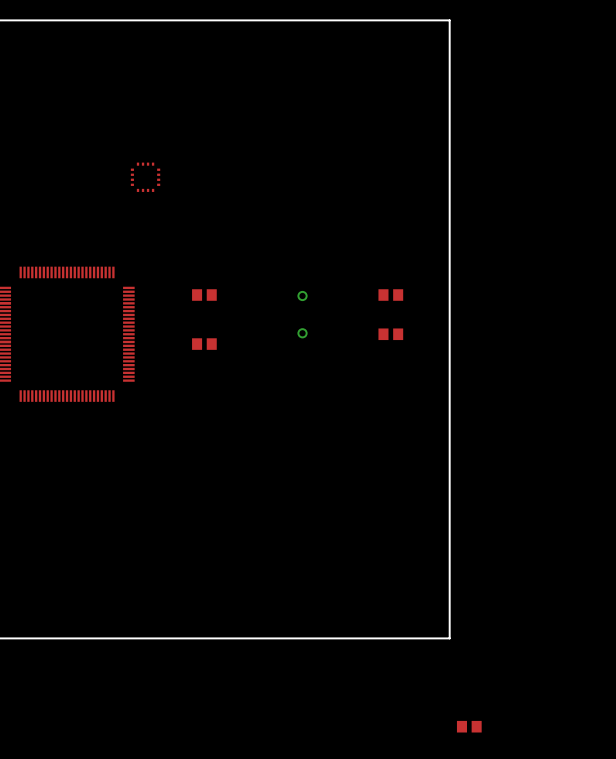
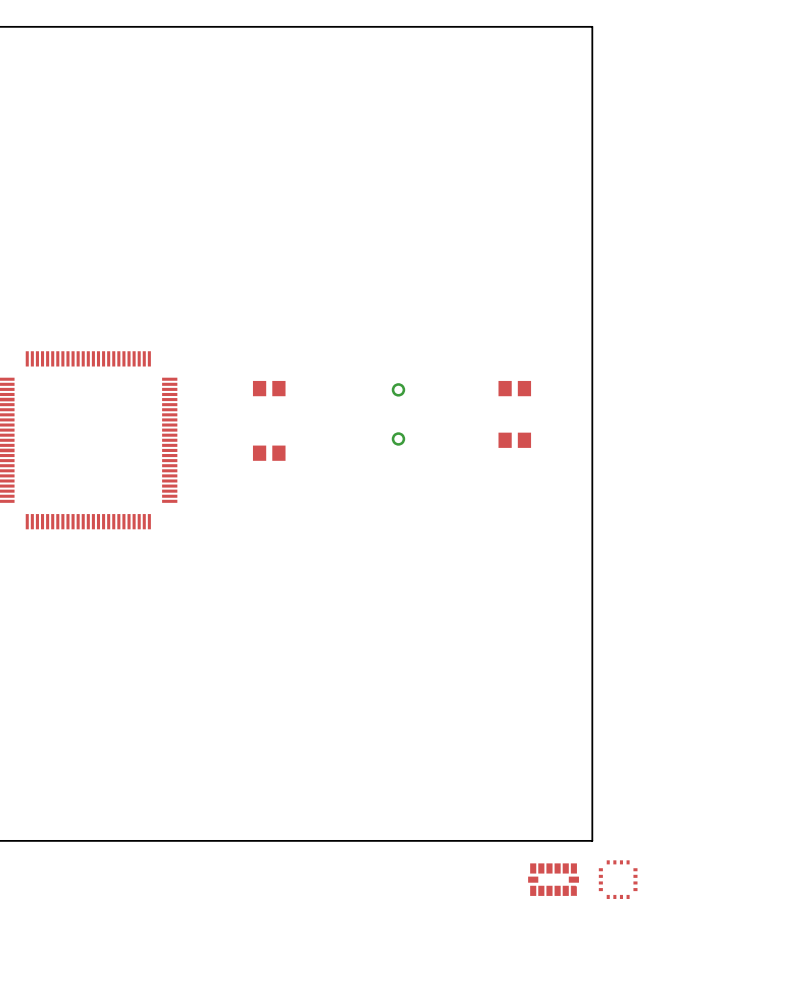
part: (145, 177) -> none
part: none -> (553, 879)
part: none -> (618, 879)
part: (469, 726) -> none

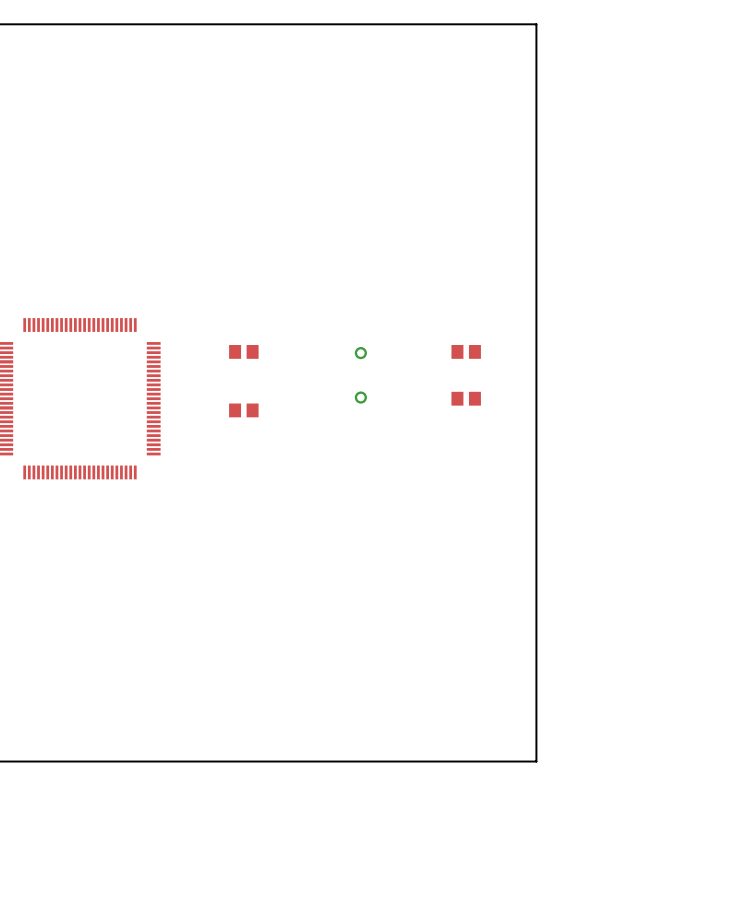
part: (553, 879) -> none
part: (618, 879) -> none

